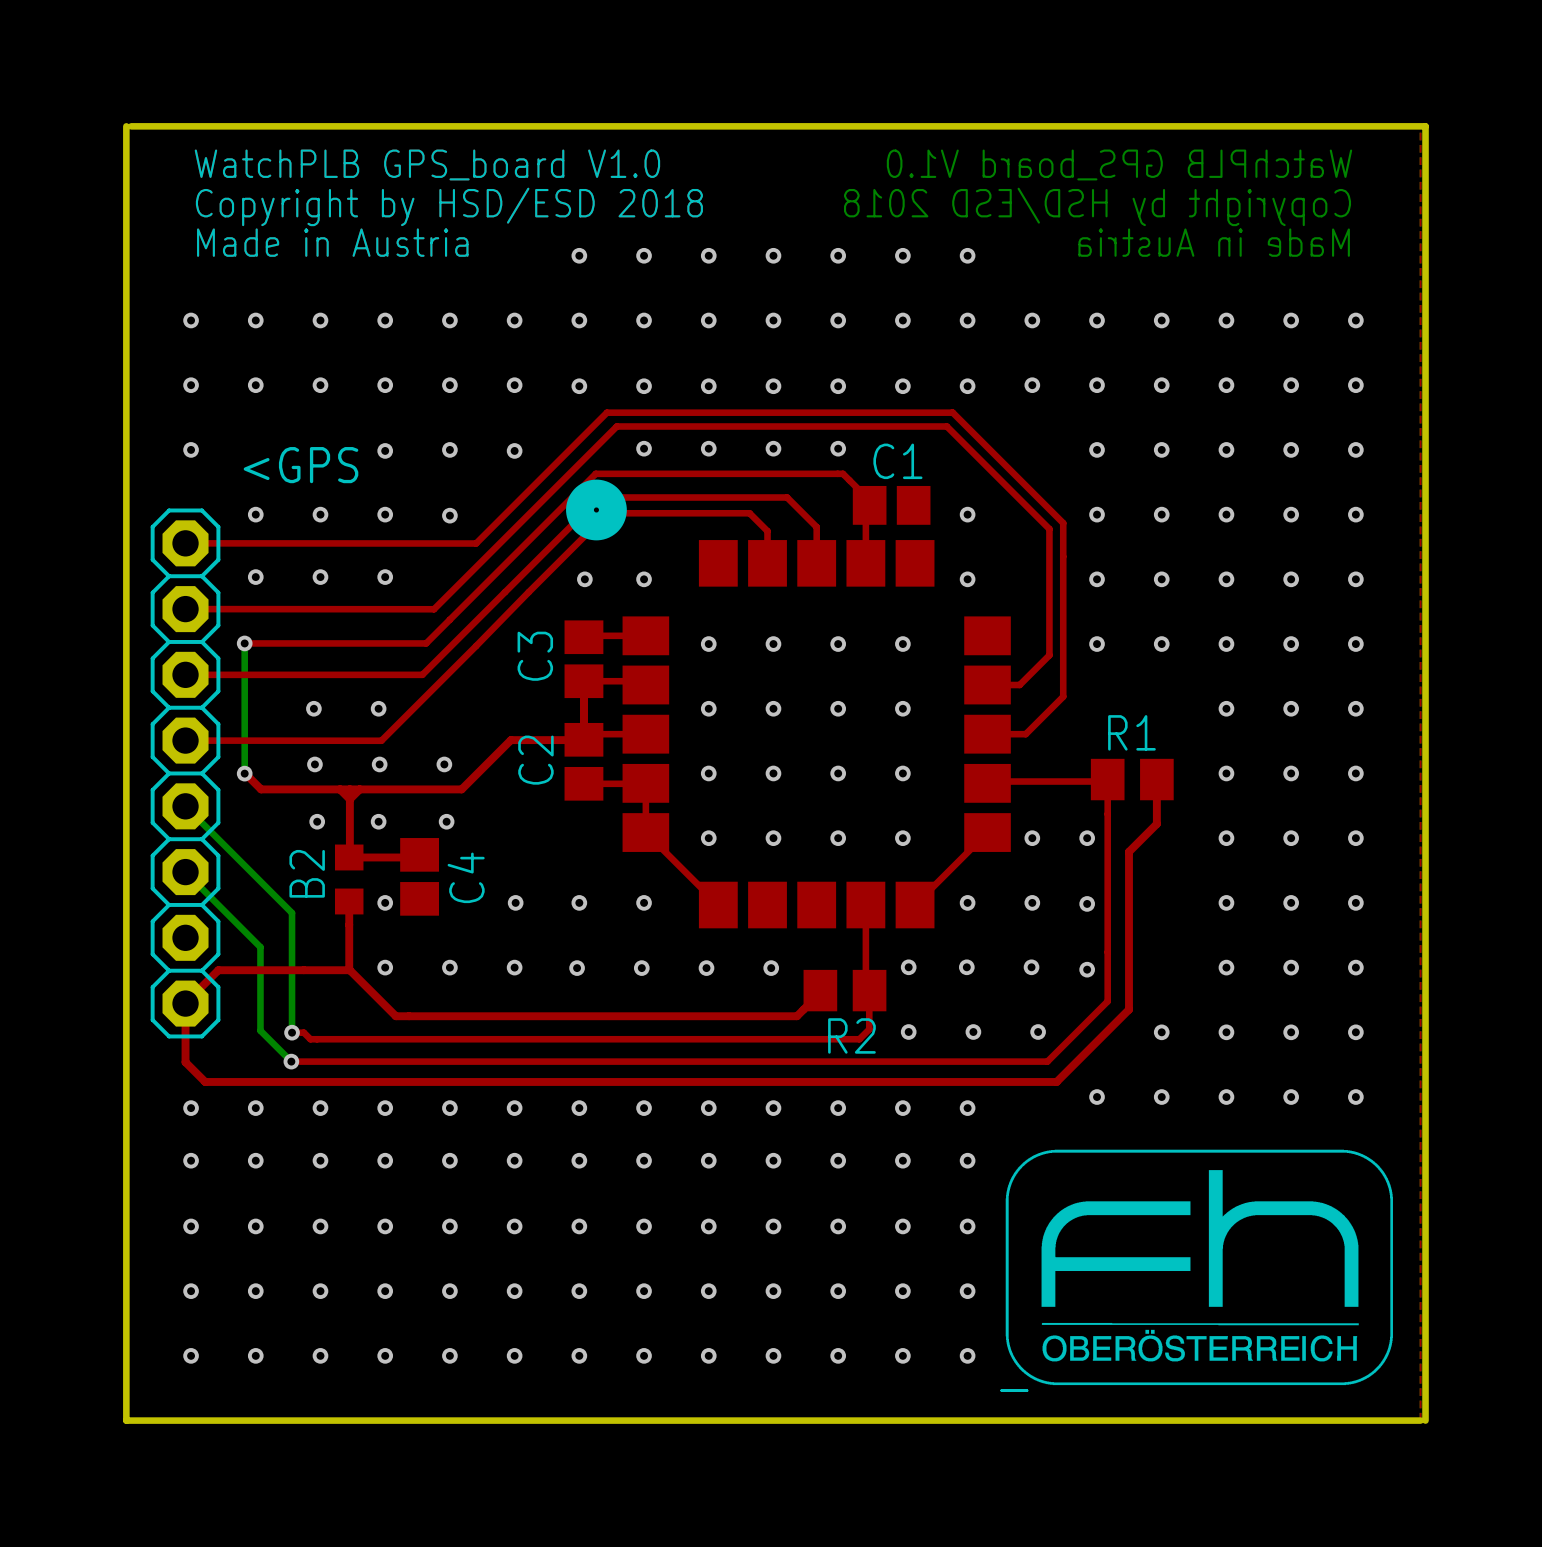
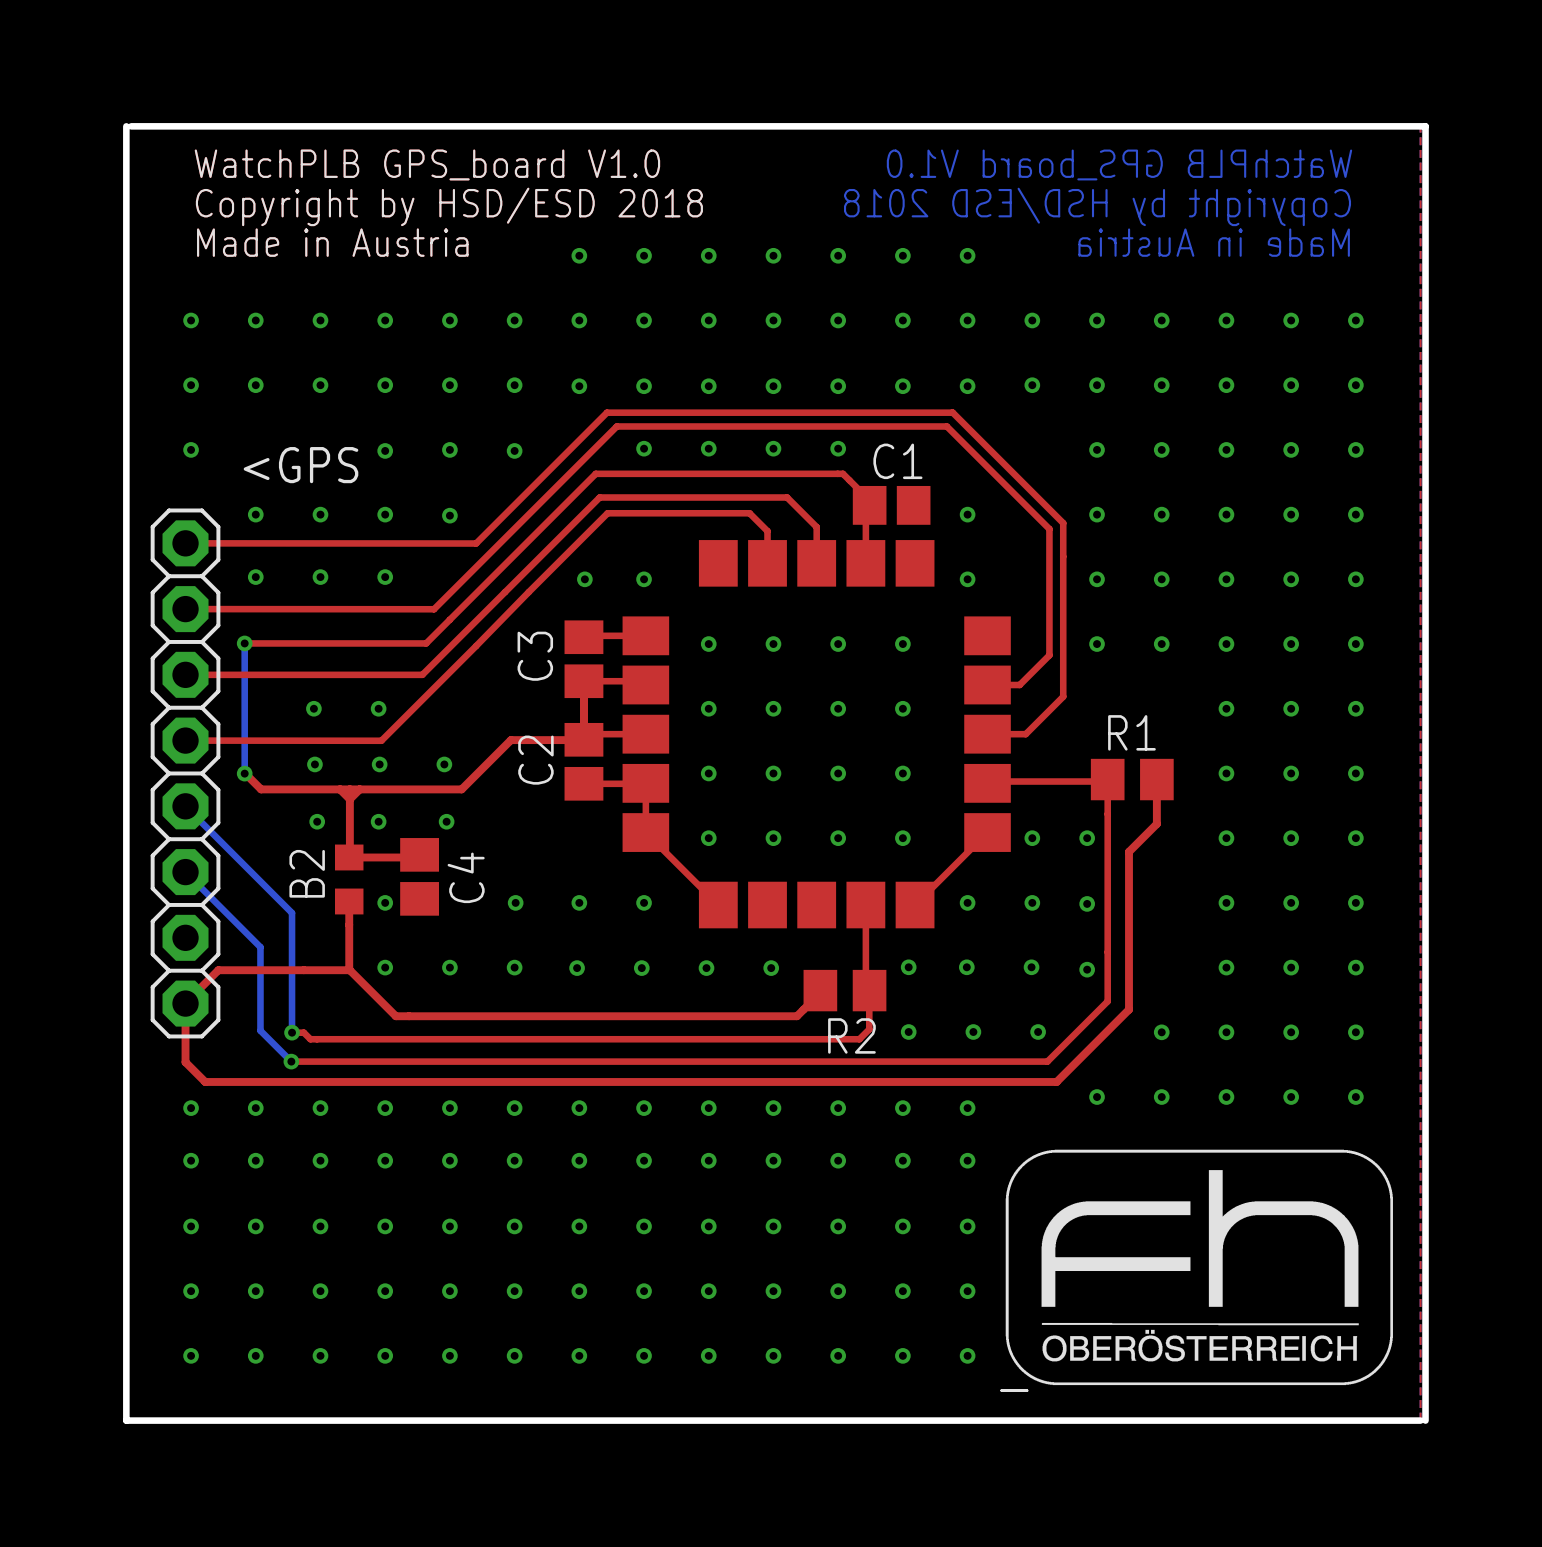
drawing: [566, 479, 627, 541] -> none

